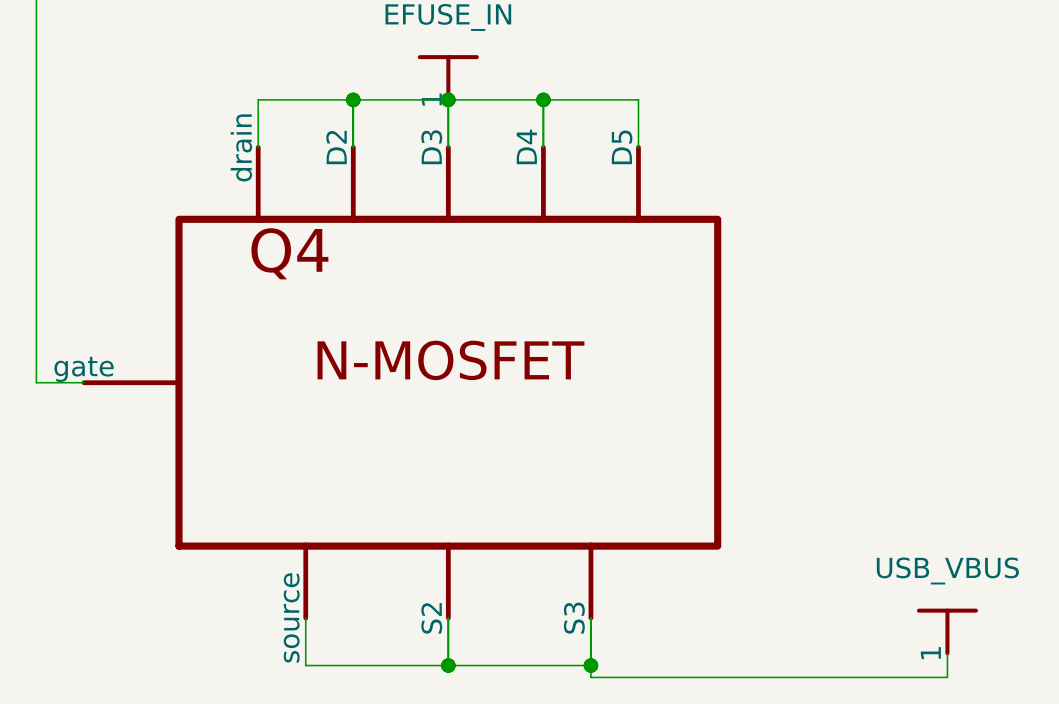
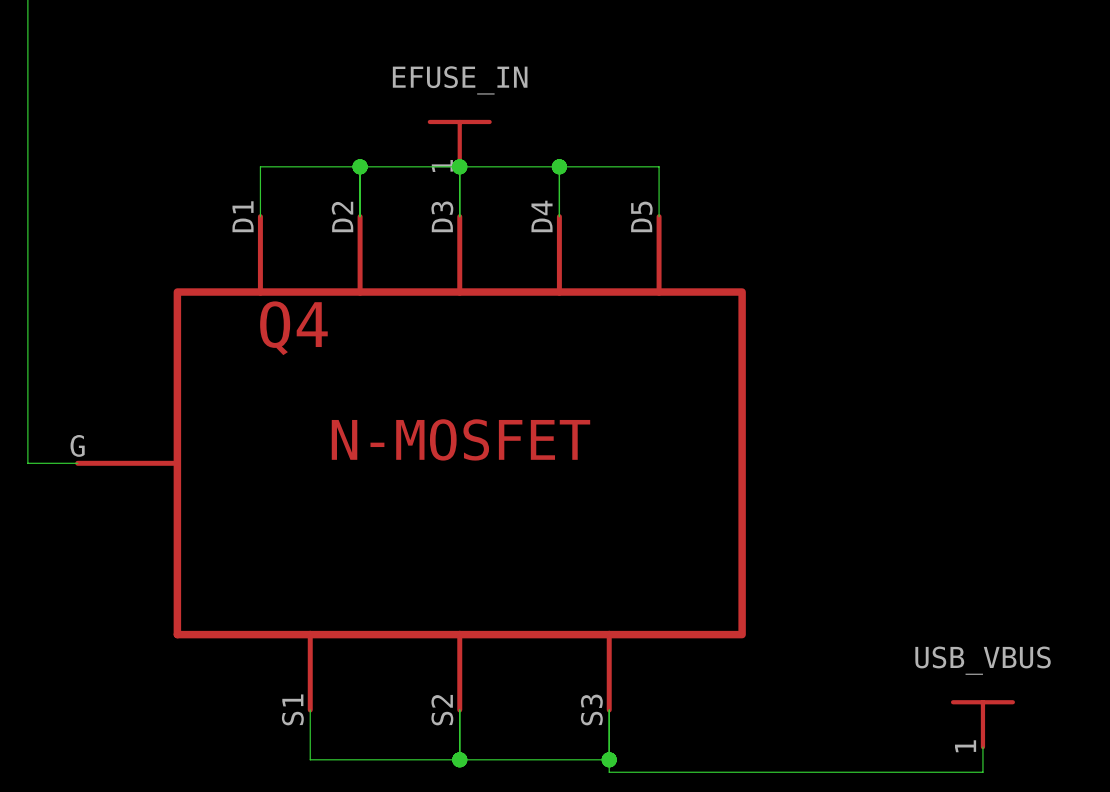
part pin name: drain (241, 147) -> D1 (243, 216)
part pin name: gate (84, 369) -> G (77, 445)
part pin name: source (291, 617) -> S1 (292, 709)

